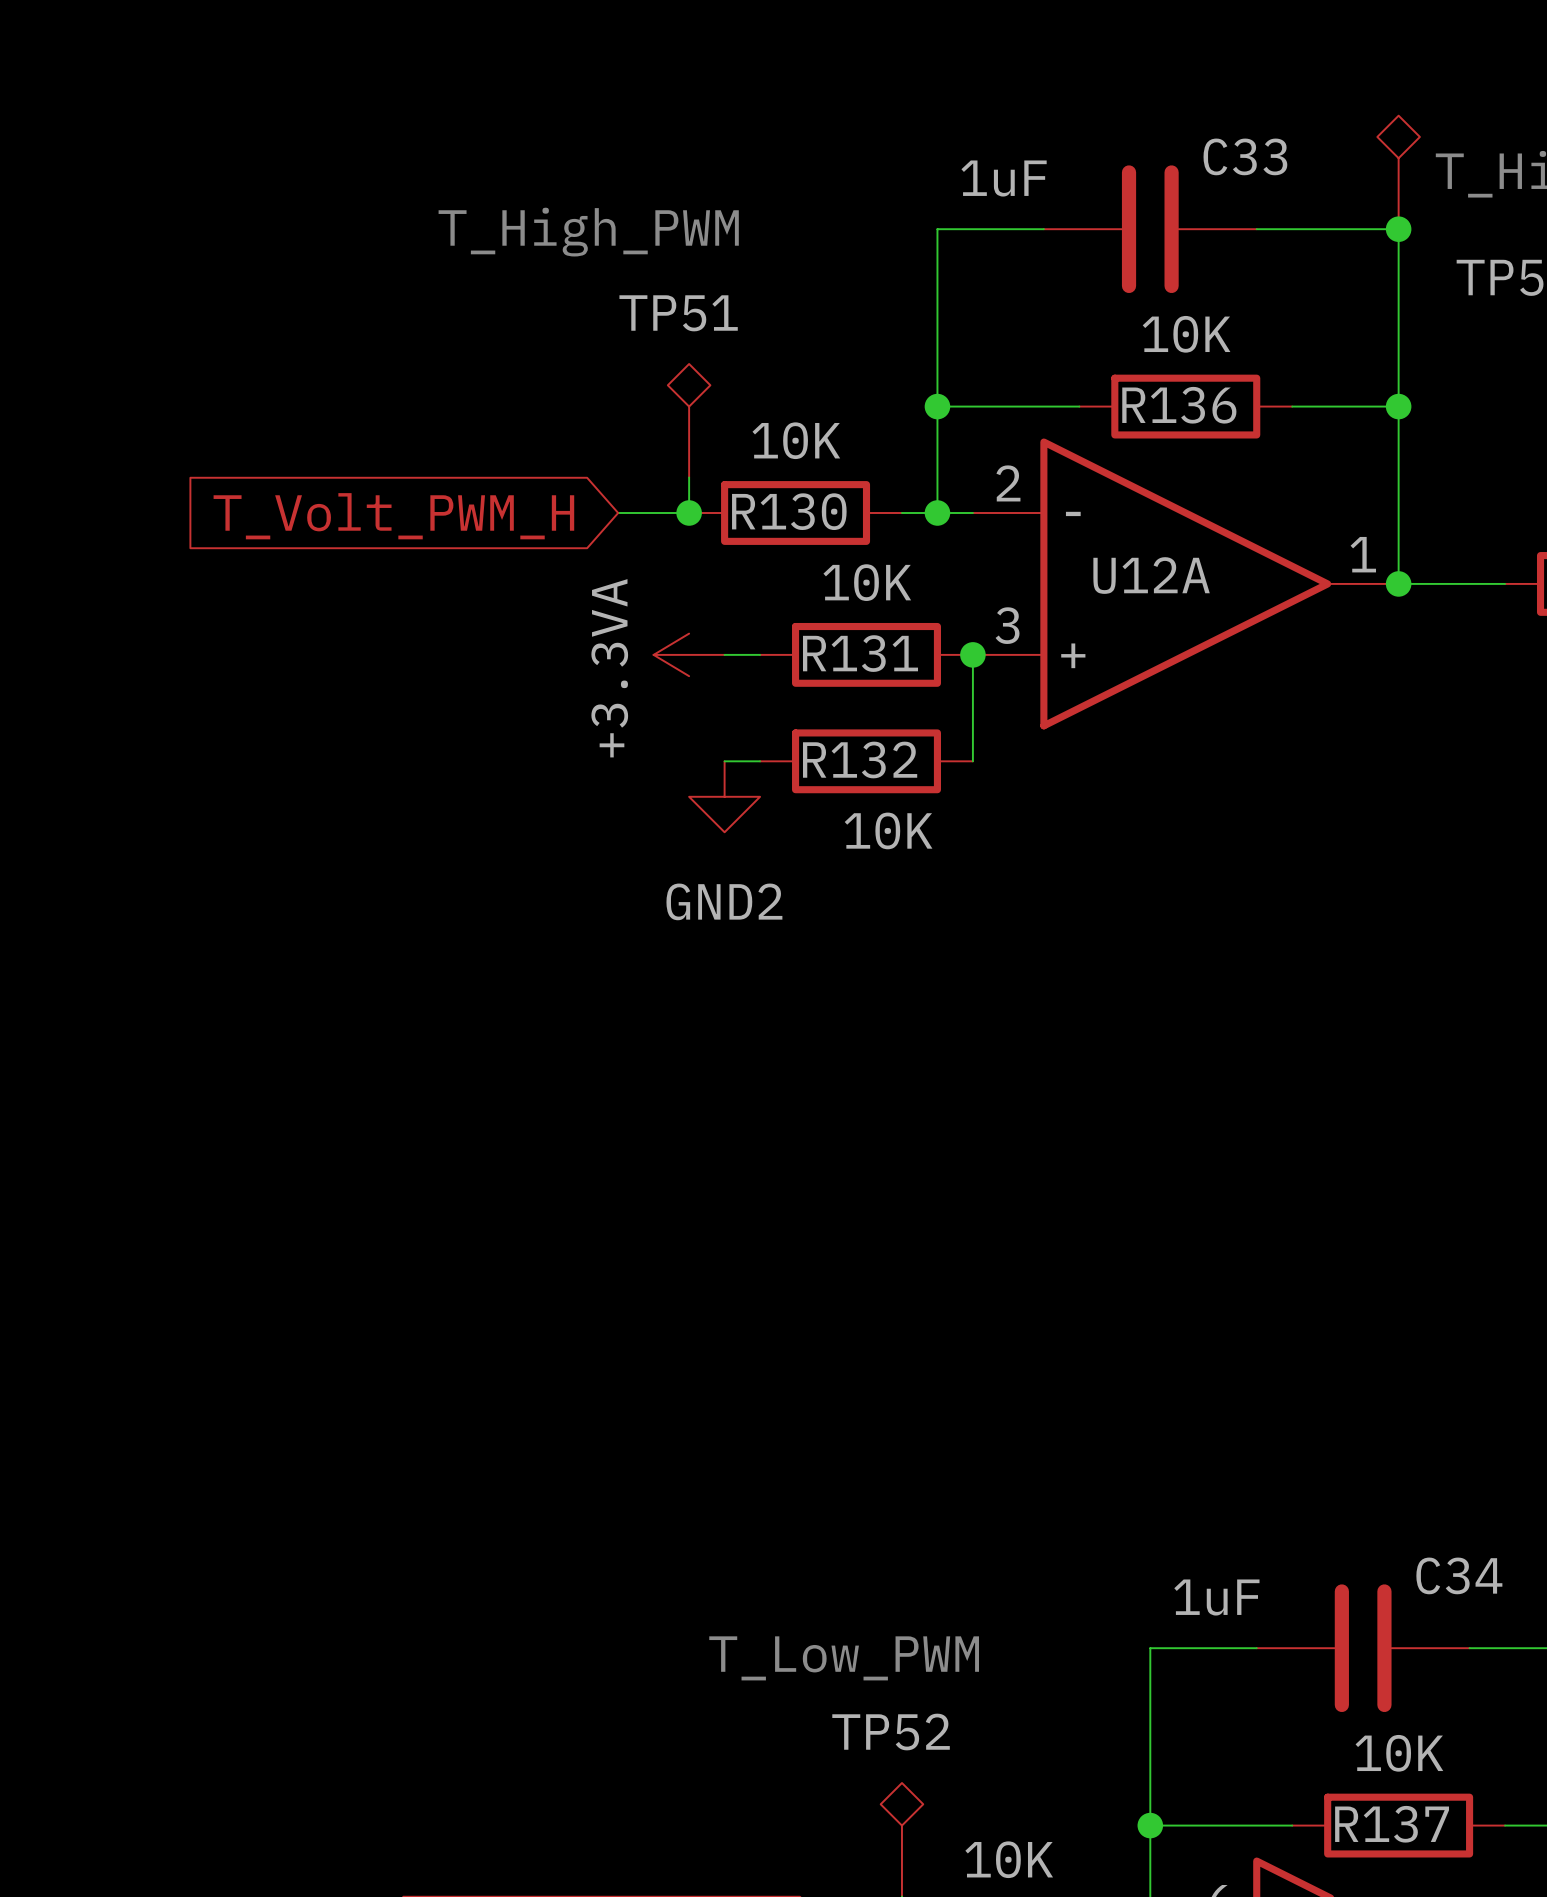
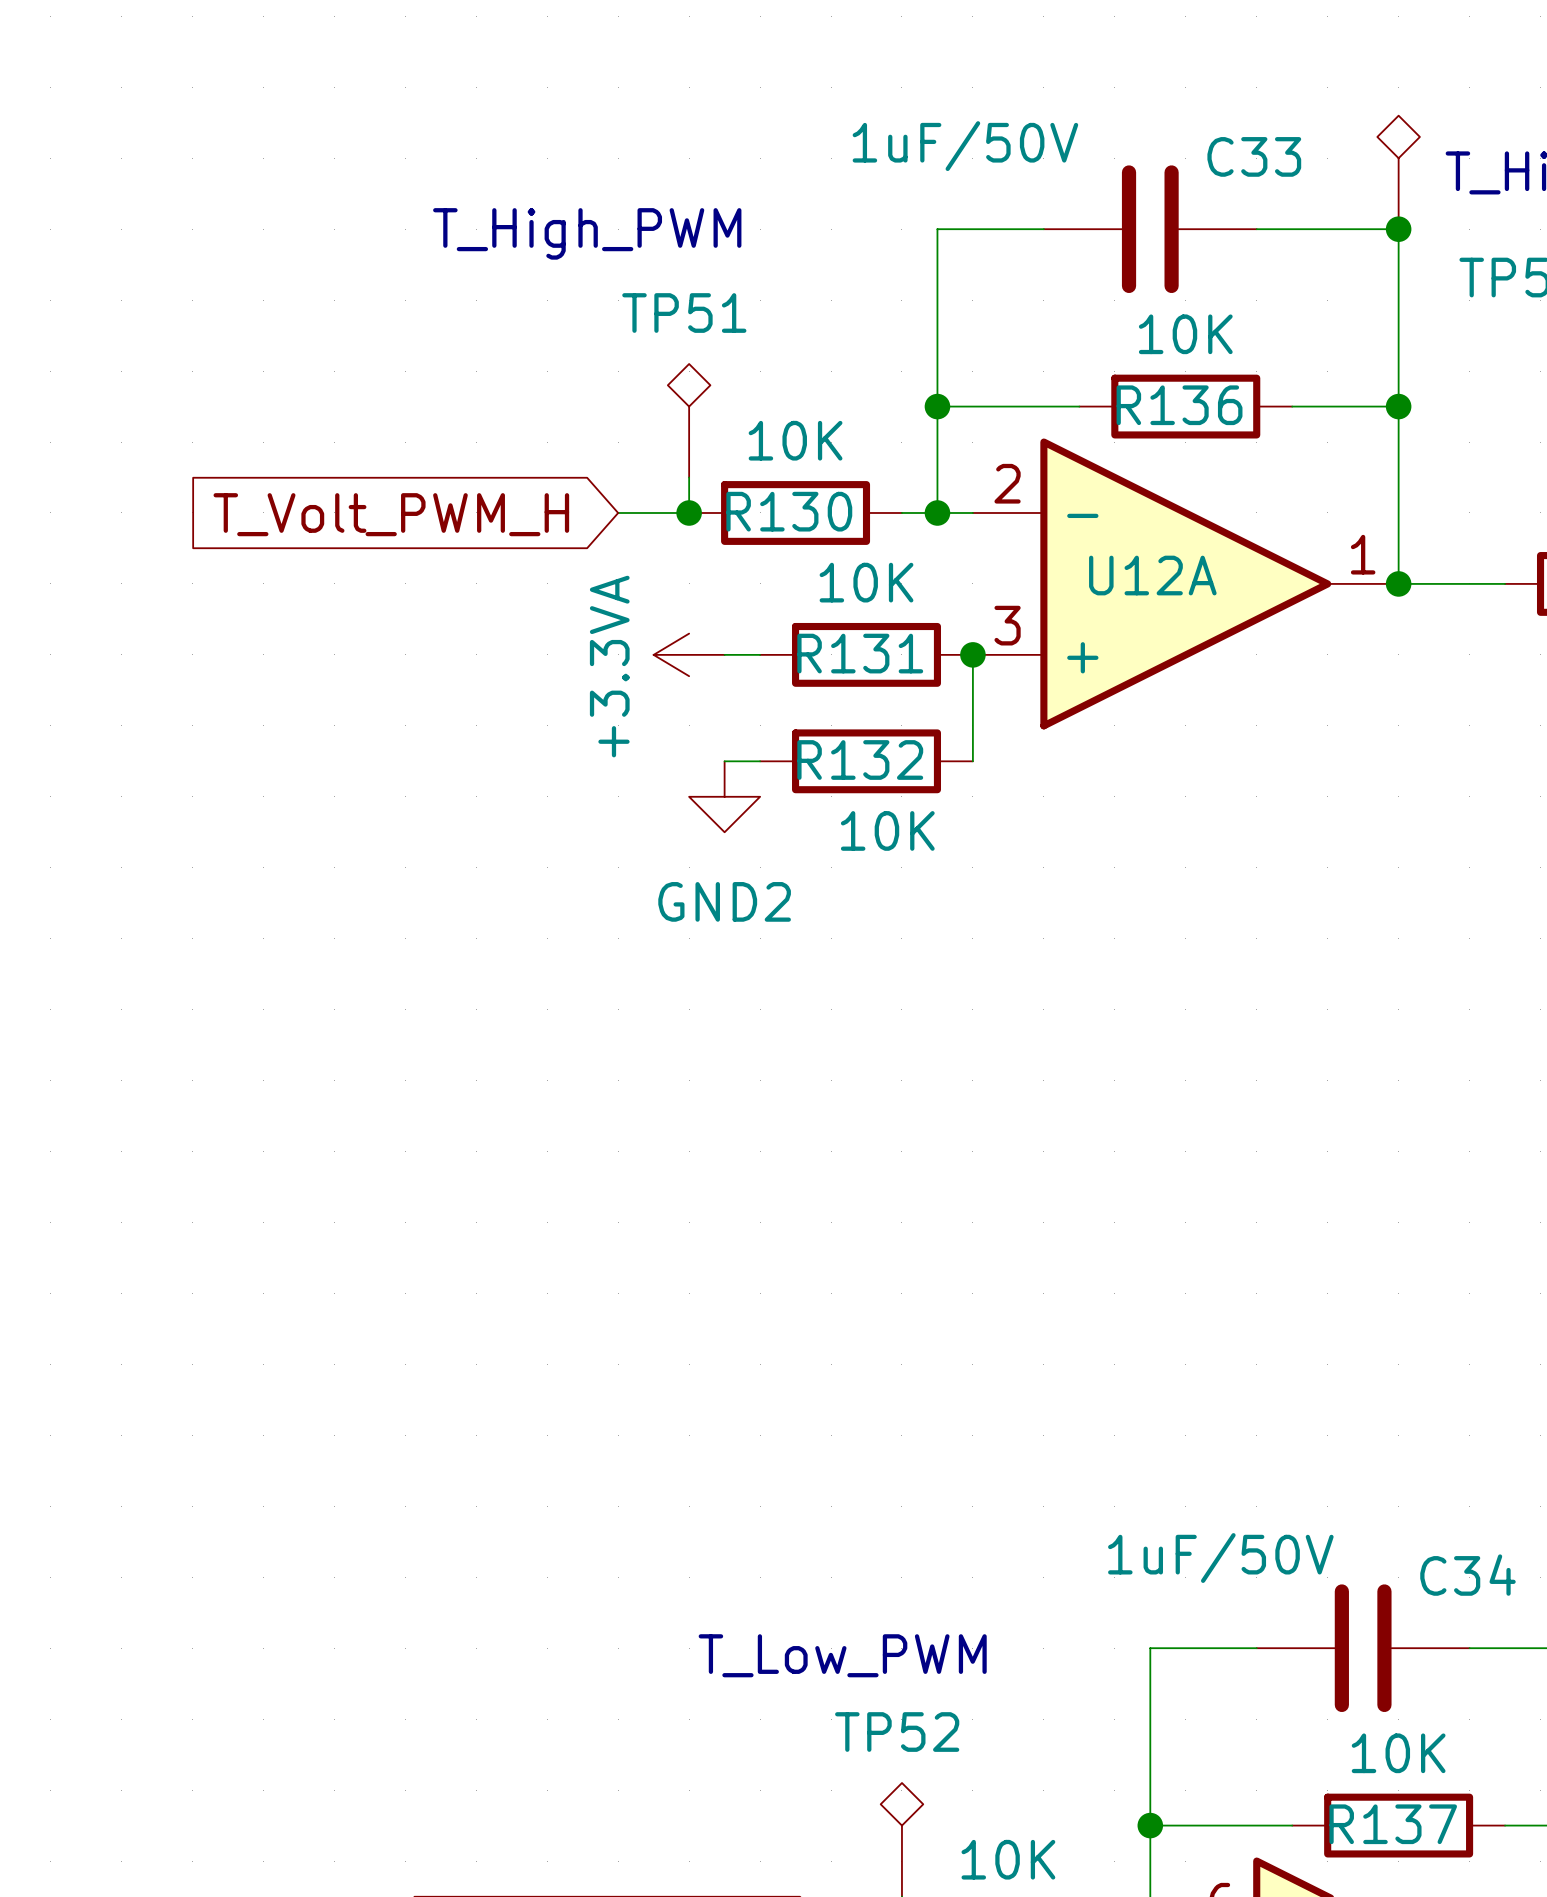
C33 value: 1uF (1004, 178) -> 1uF/50V (965, 146)
C34 value: 1uF (1216, 1597) -> 1uF/50V (1220, 1558)

